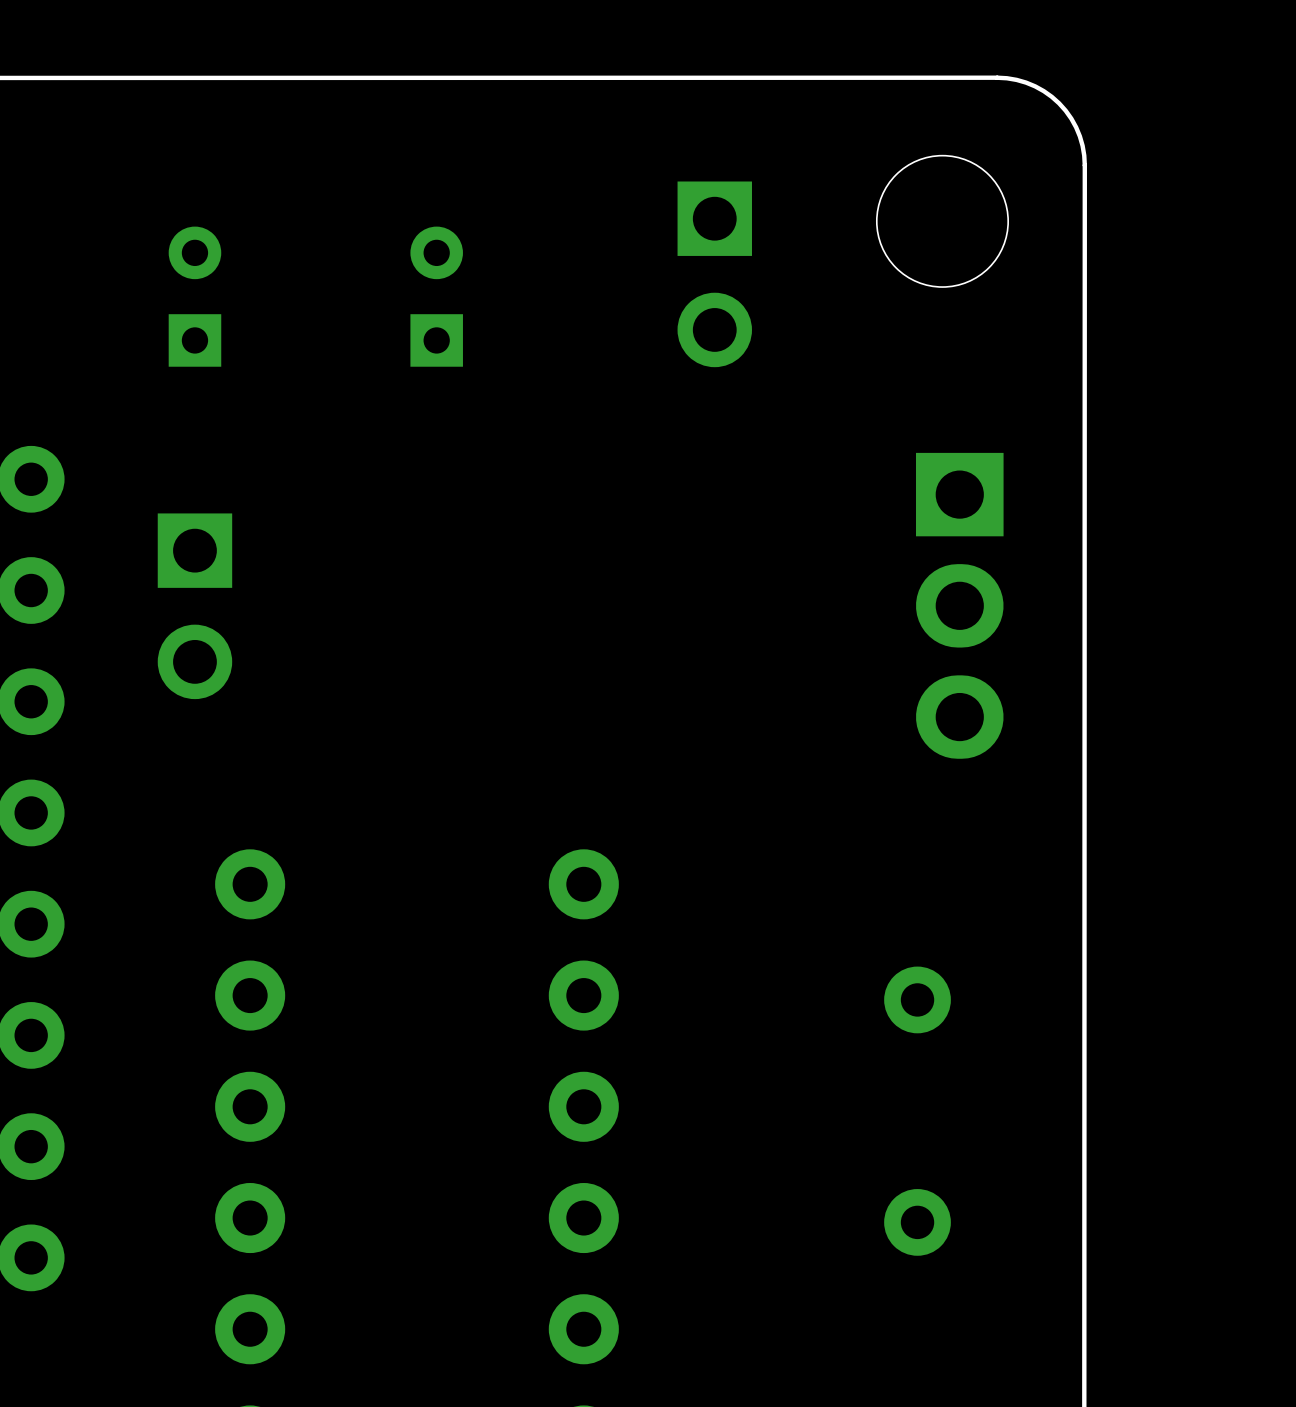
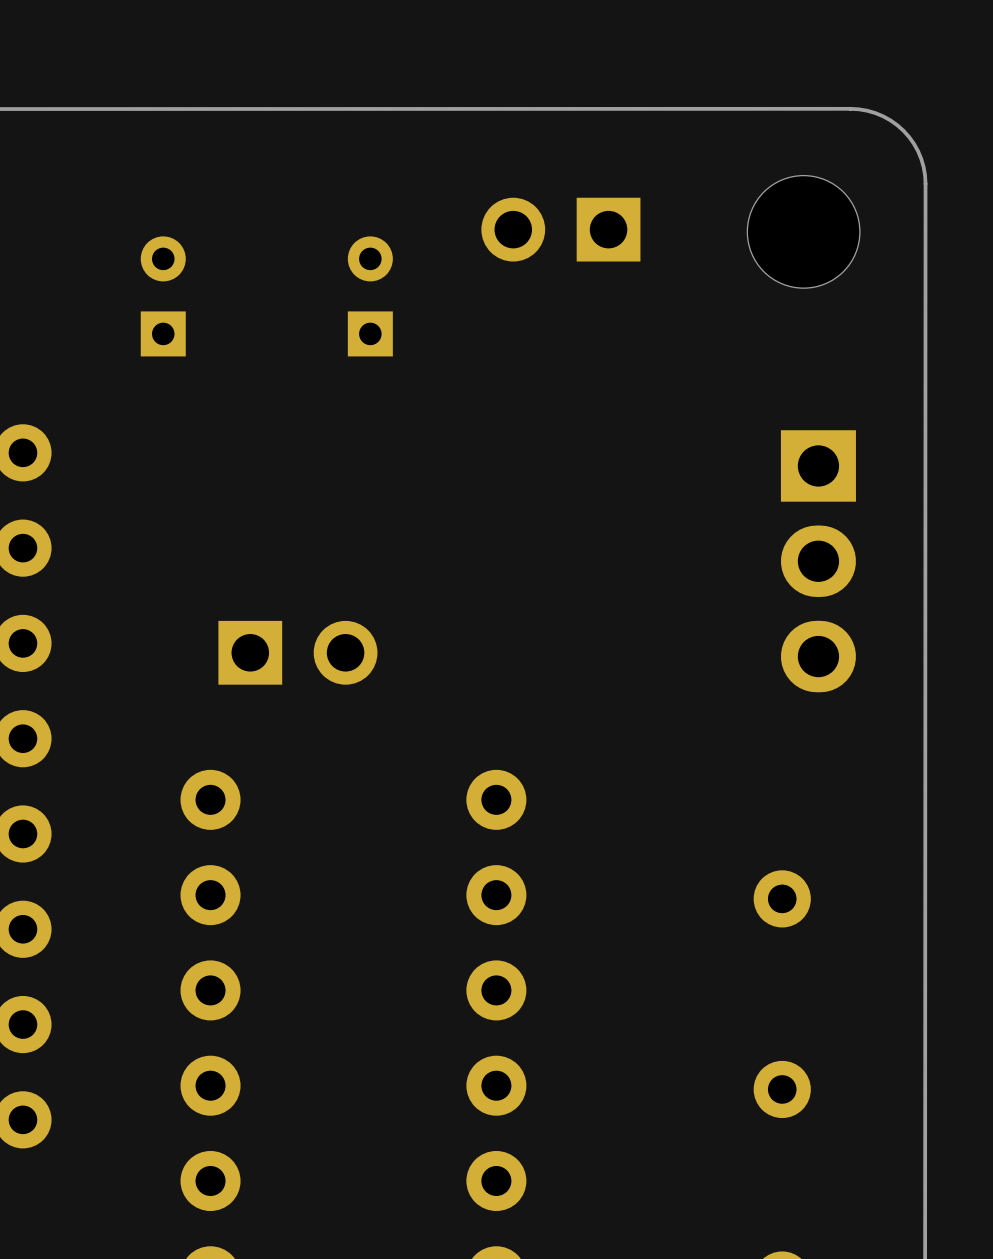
part rotation: 0° (714, 274) -> 90° clockwise (560, 229)
part rotation: 0° (194, 606) -> 90° counterclockwise (297, 652)
part position: (194, 606) -> (297, 652)

